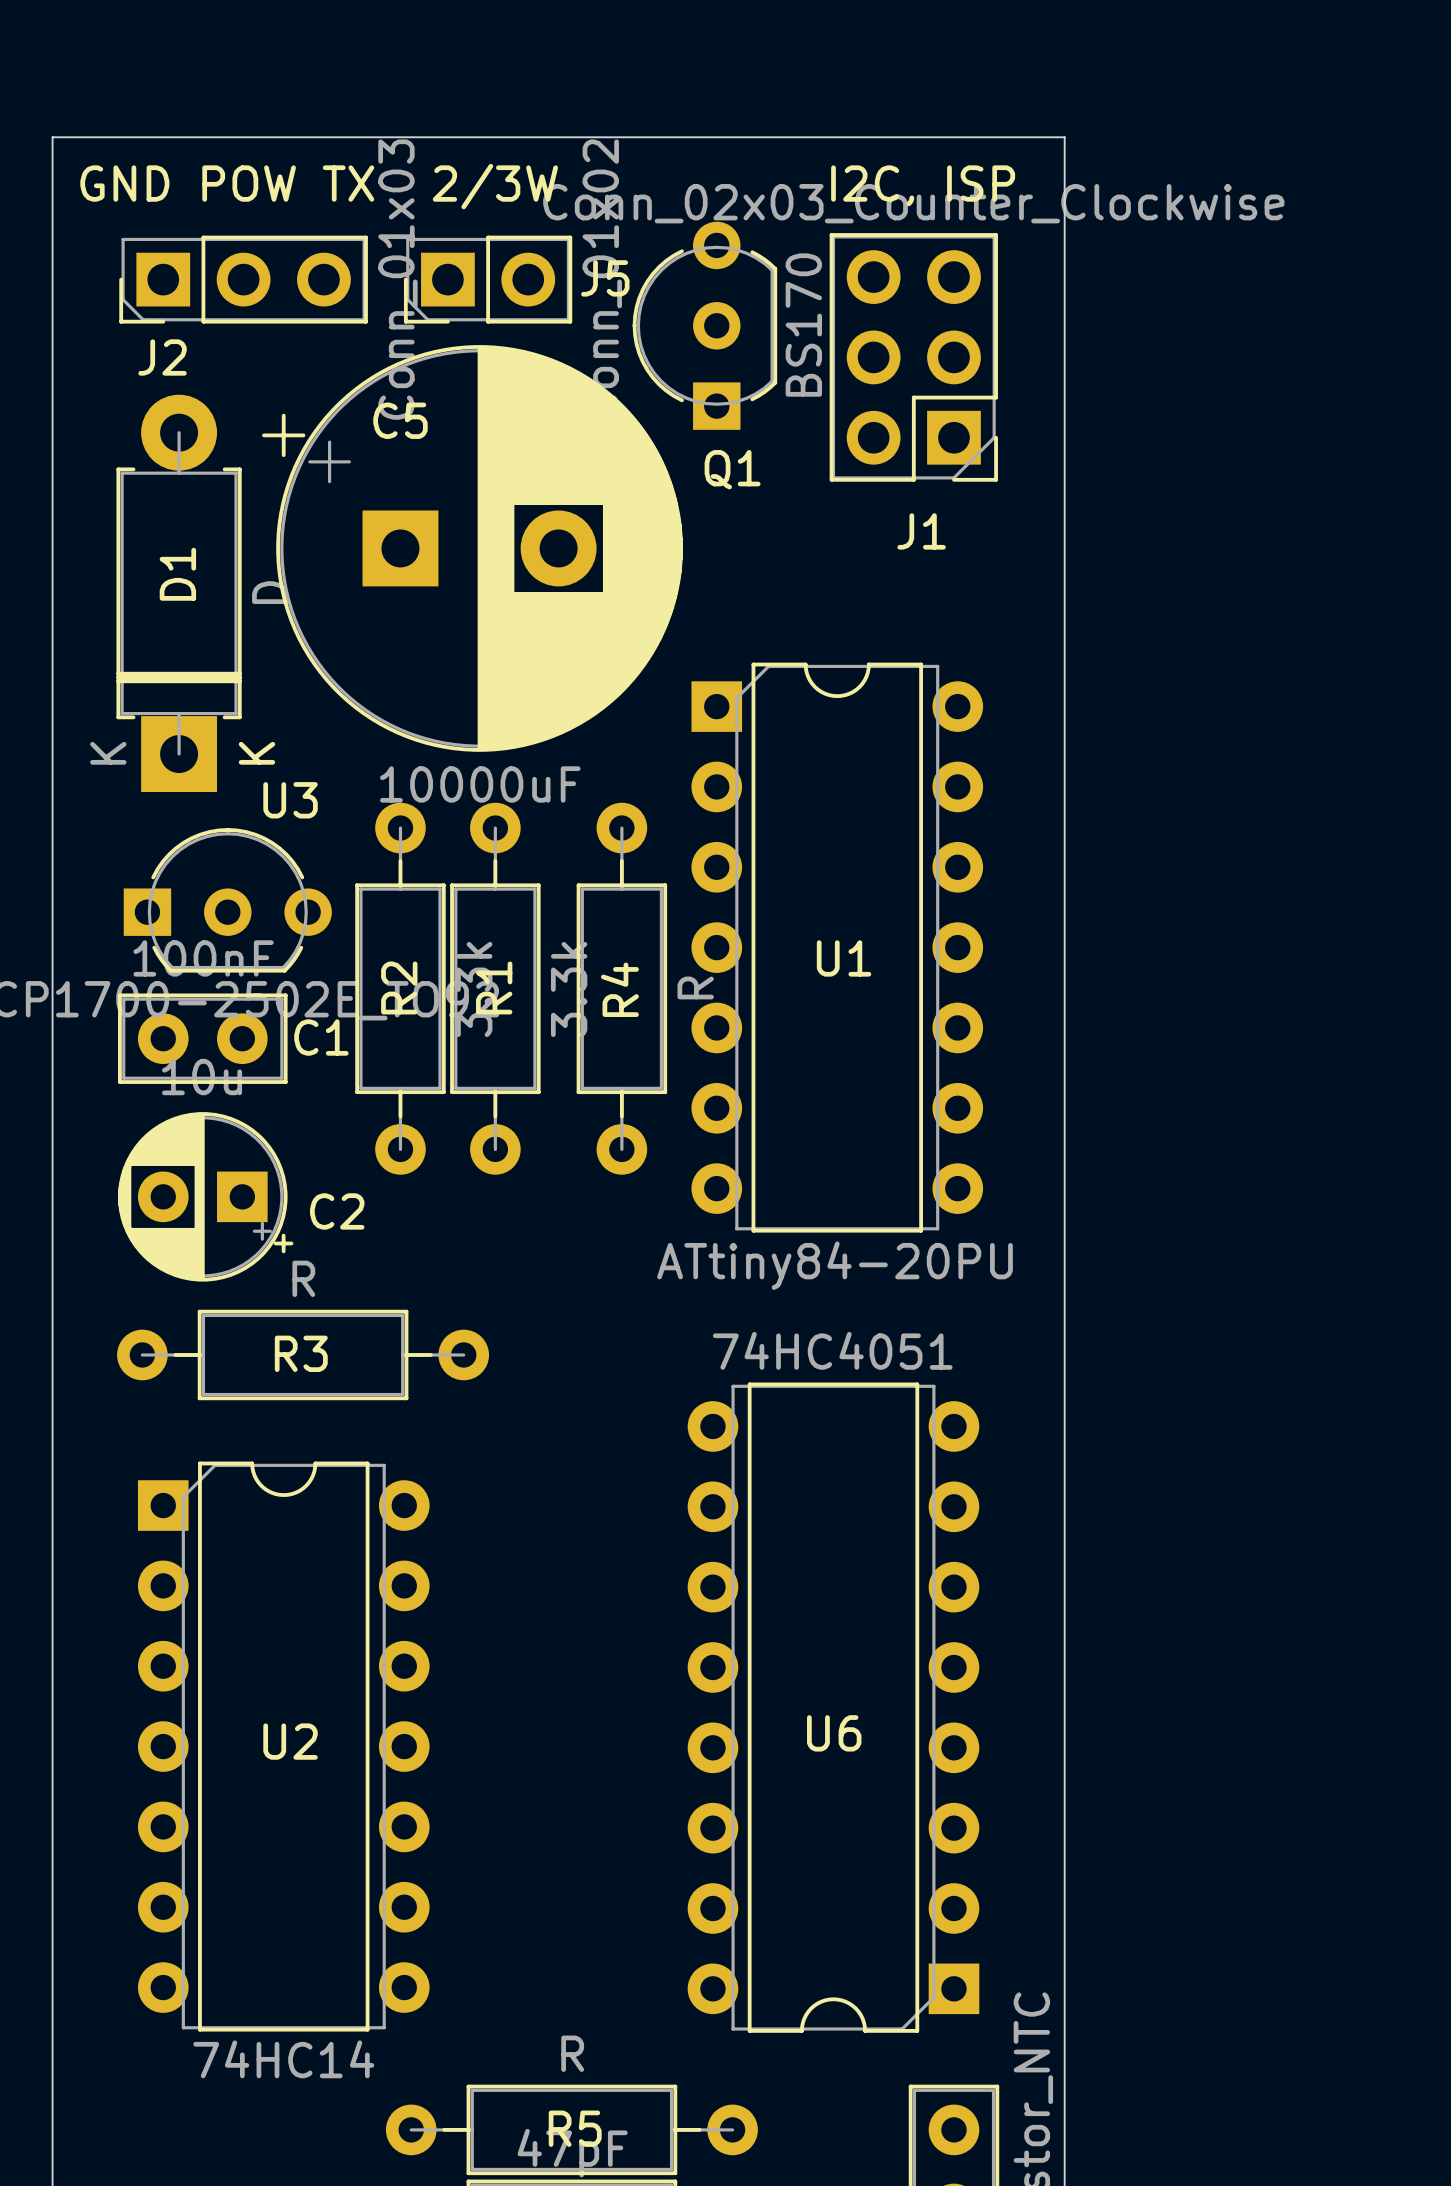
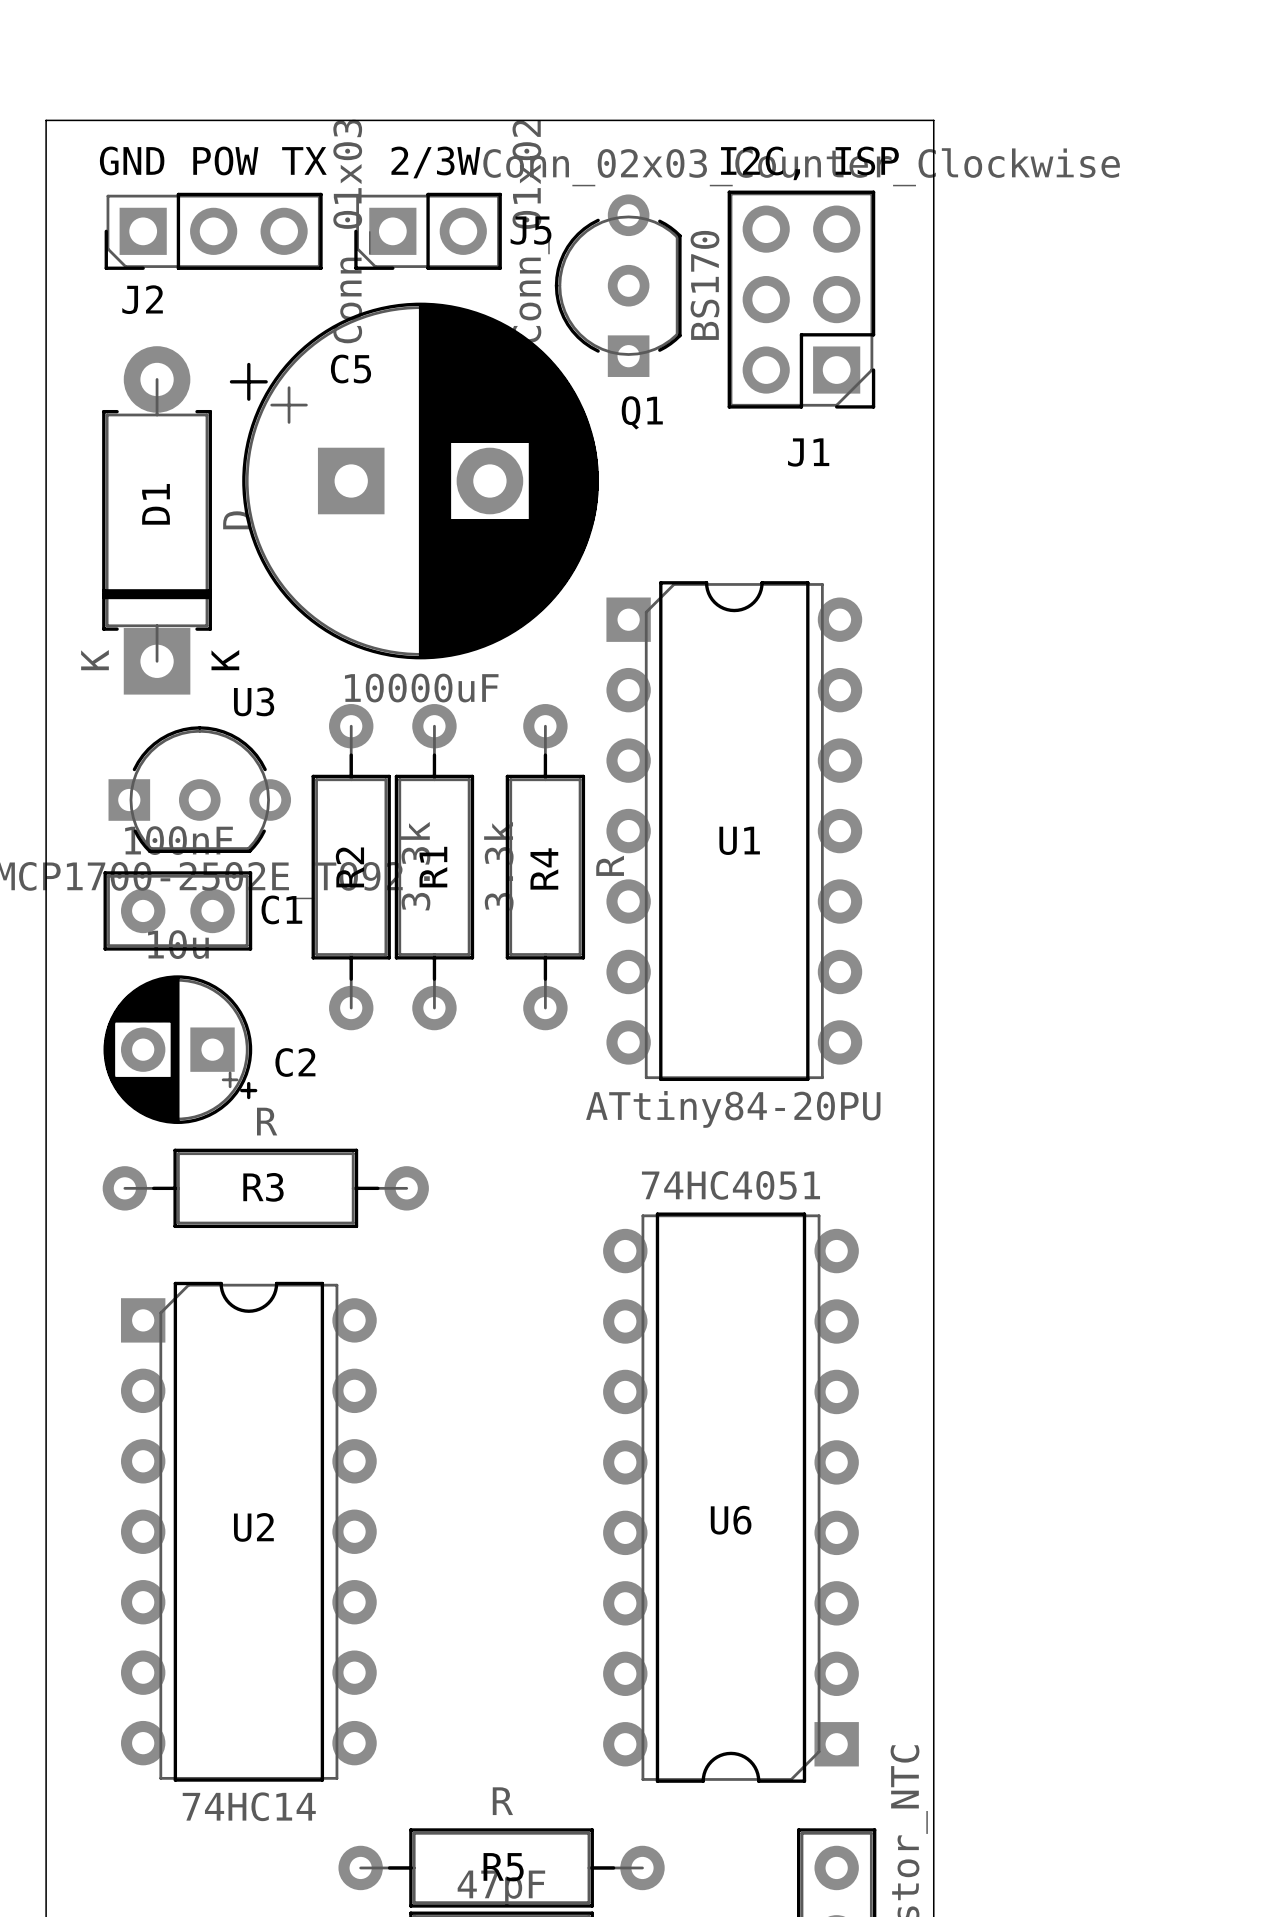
text position: GND POW TX (227, 183) -> GND POW TX (213, 160)
J2 position: (243, 279) -> (213, 231)
J5 position: (488, 279) -> (428, 231)
J1 position: (913, 357) -> (801, 299)

